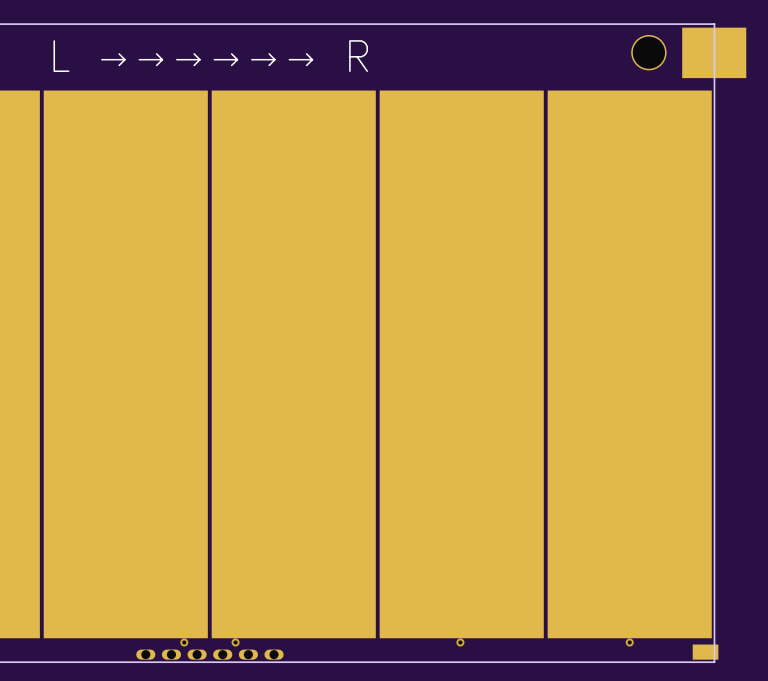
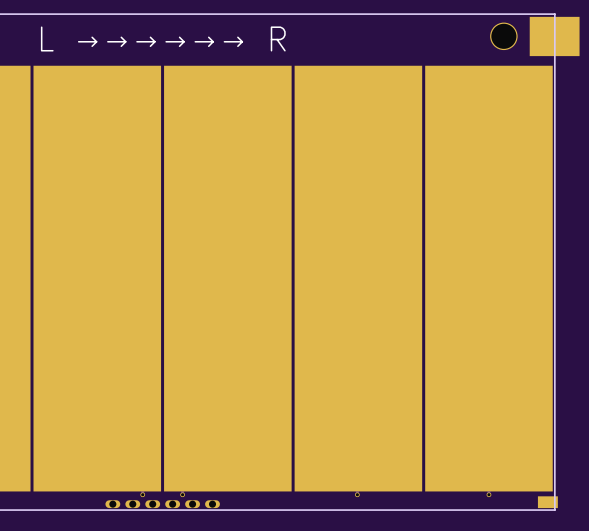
via: (184, 642) -> none
part: none -> (142, 494)
via: (235, 642) -> none
part: none -> (182, 494)
via: (460, 642) -> none
part: none -> (357, 494)
via: (629, 642) -> none
part: none -> (488, 494)

